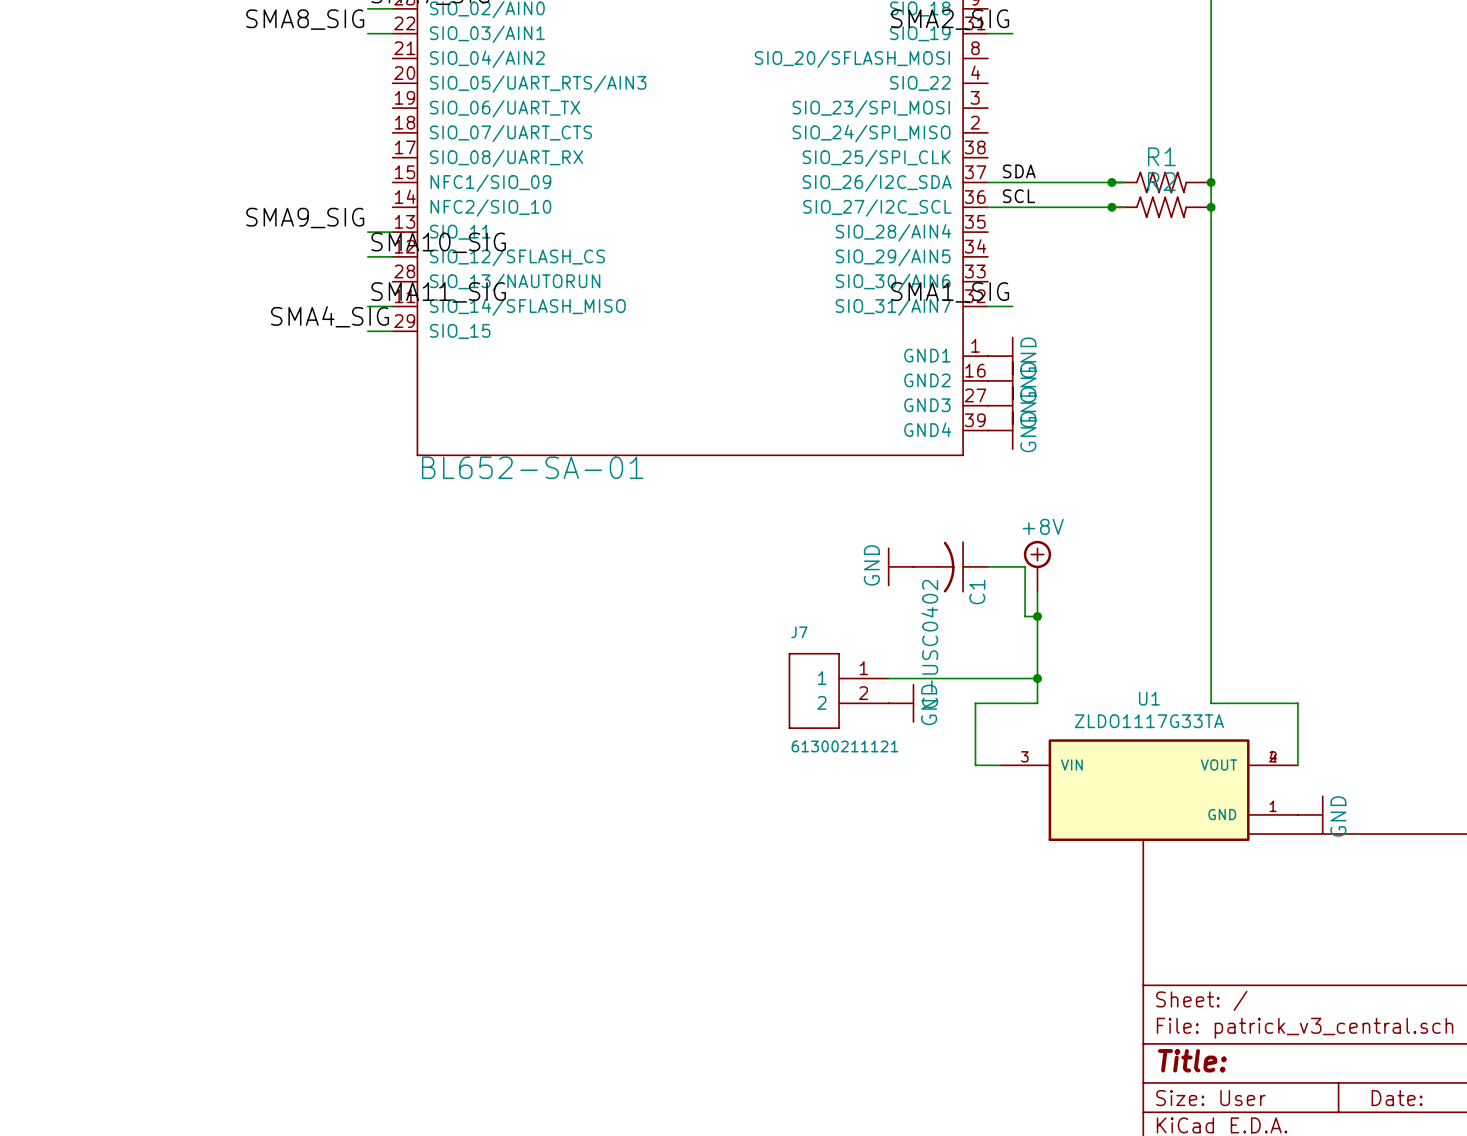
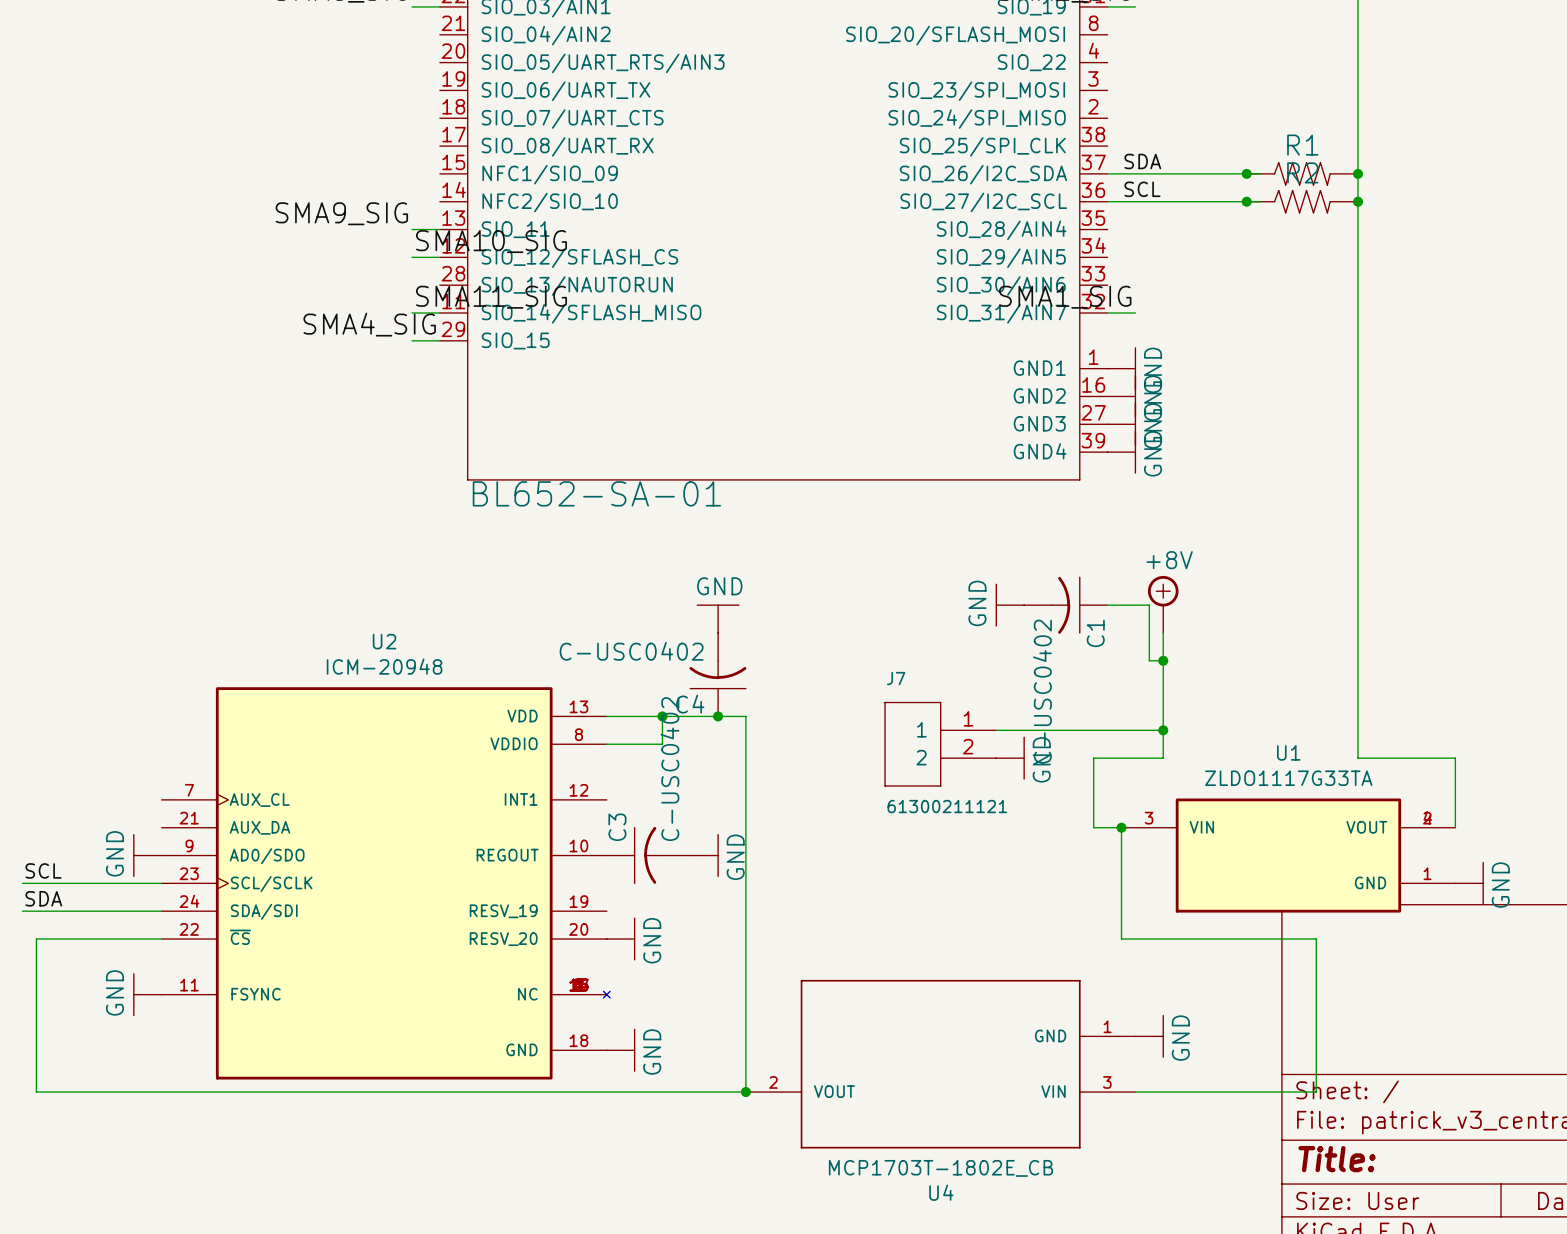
power symbol: none -> GND (718, 619)
C4: none -> C-USC0402 (717, 674)
wire: none -> (606, 716) (745, 716) (745, 1092) (36, 1092) (36, 939) (161, 939)
wire: none -> (662, 716) (662, 744) (606, 744)
junction: none -> (662, 716)
junction: none -> (718, 716)
wire: none -> (1121, 827) (1121, 939) (1316, 939) (1316, 1092) (1135, 1092)
junction: none -> (1121, 827)
C3: none -> C-USC0402 (648, 855)
power symbol: none -> GND (147, 855)
power symbol: none -> GND (704, 855)
label: none -> SCL (43, 870)
wire: none -> (22, 883) (161, 883)
U2: none -> ICM-20948 (385, 883)
label: none -> SDA (43, 898)
wire: none -> (22, 911) (161, 911)
power symbol: none -> GND (620, 939)
power symbol: none -> GND (147, 994)
power symbol: none -> GND (1149, 1036)
power symbol: none -> GND (620, 1050)
U4: none -> MCP1703T-1802E_CB (940, 1064)
junction: none -> (745, 1092)

